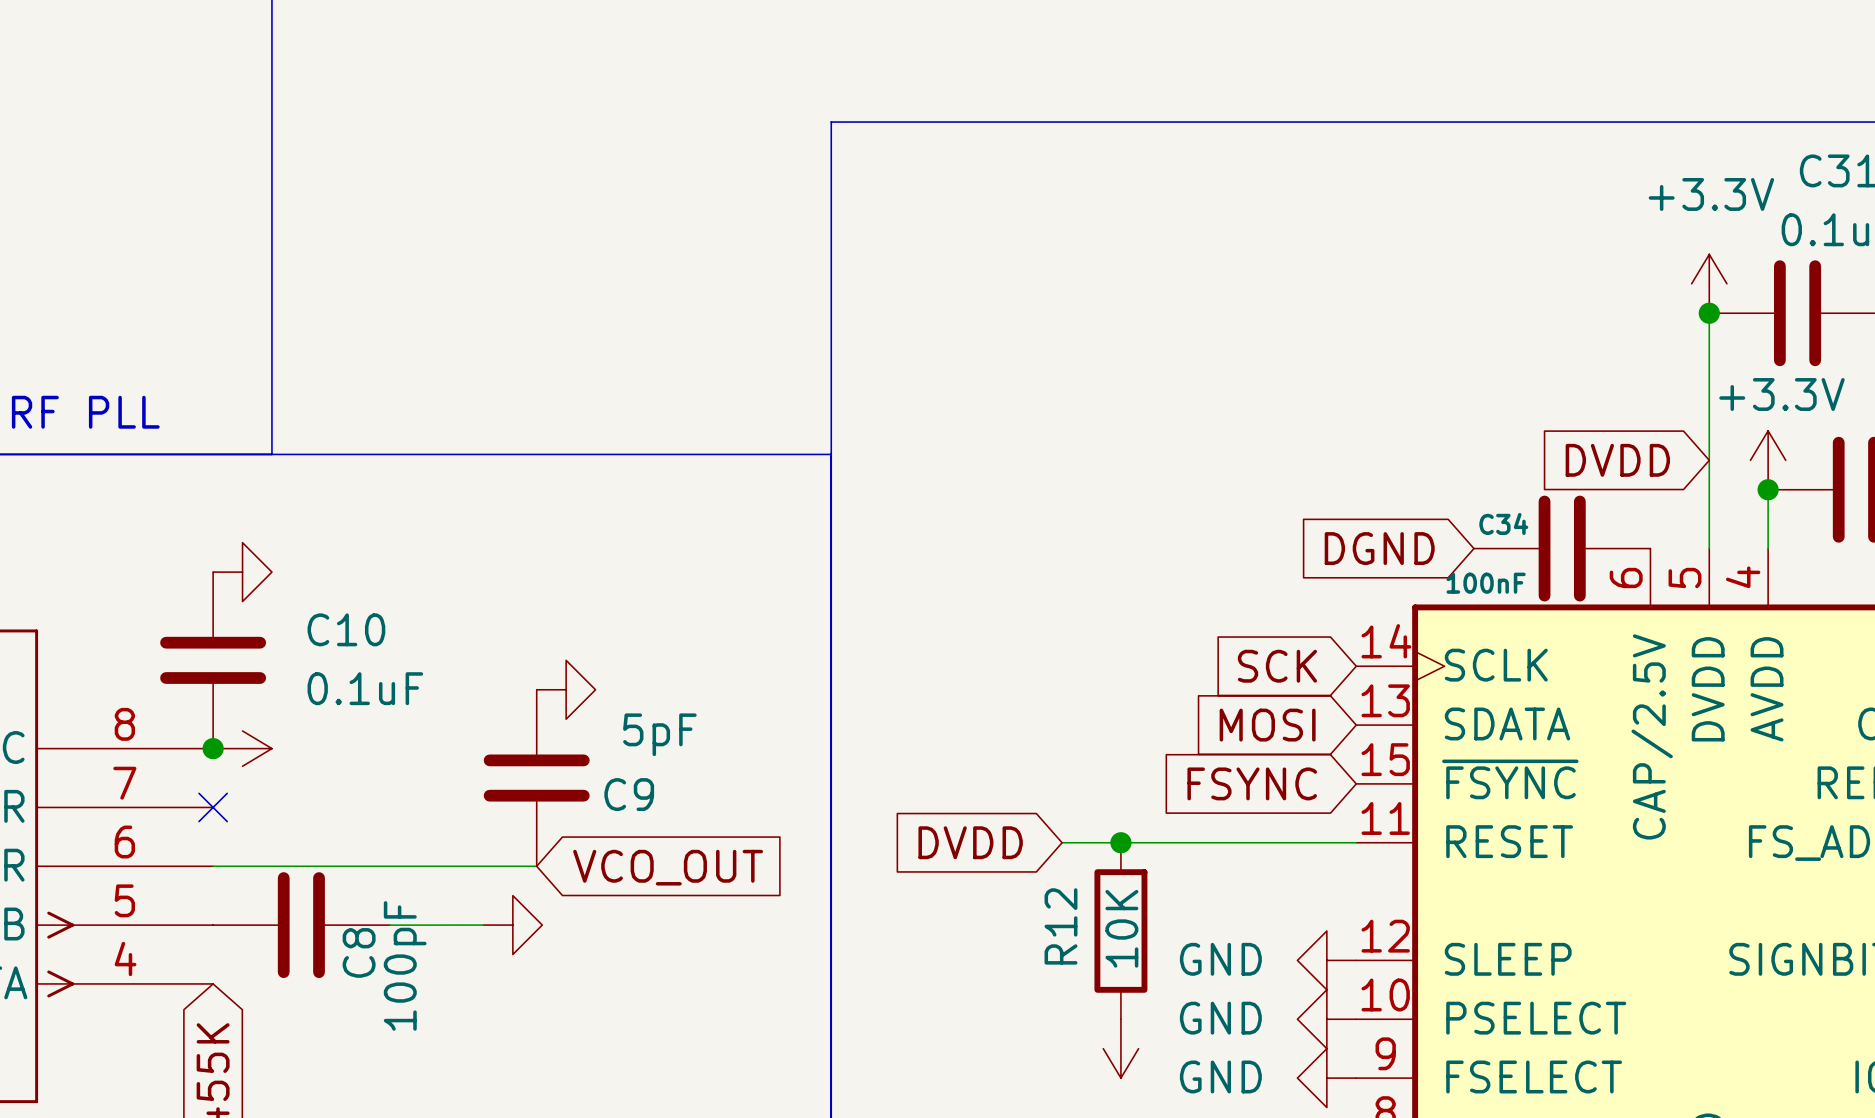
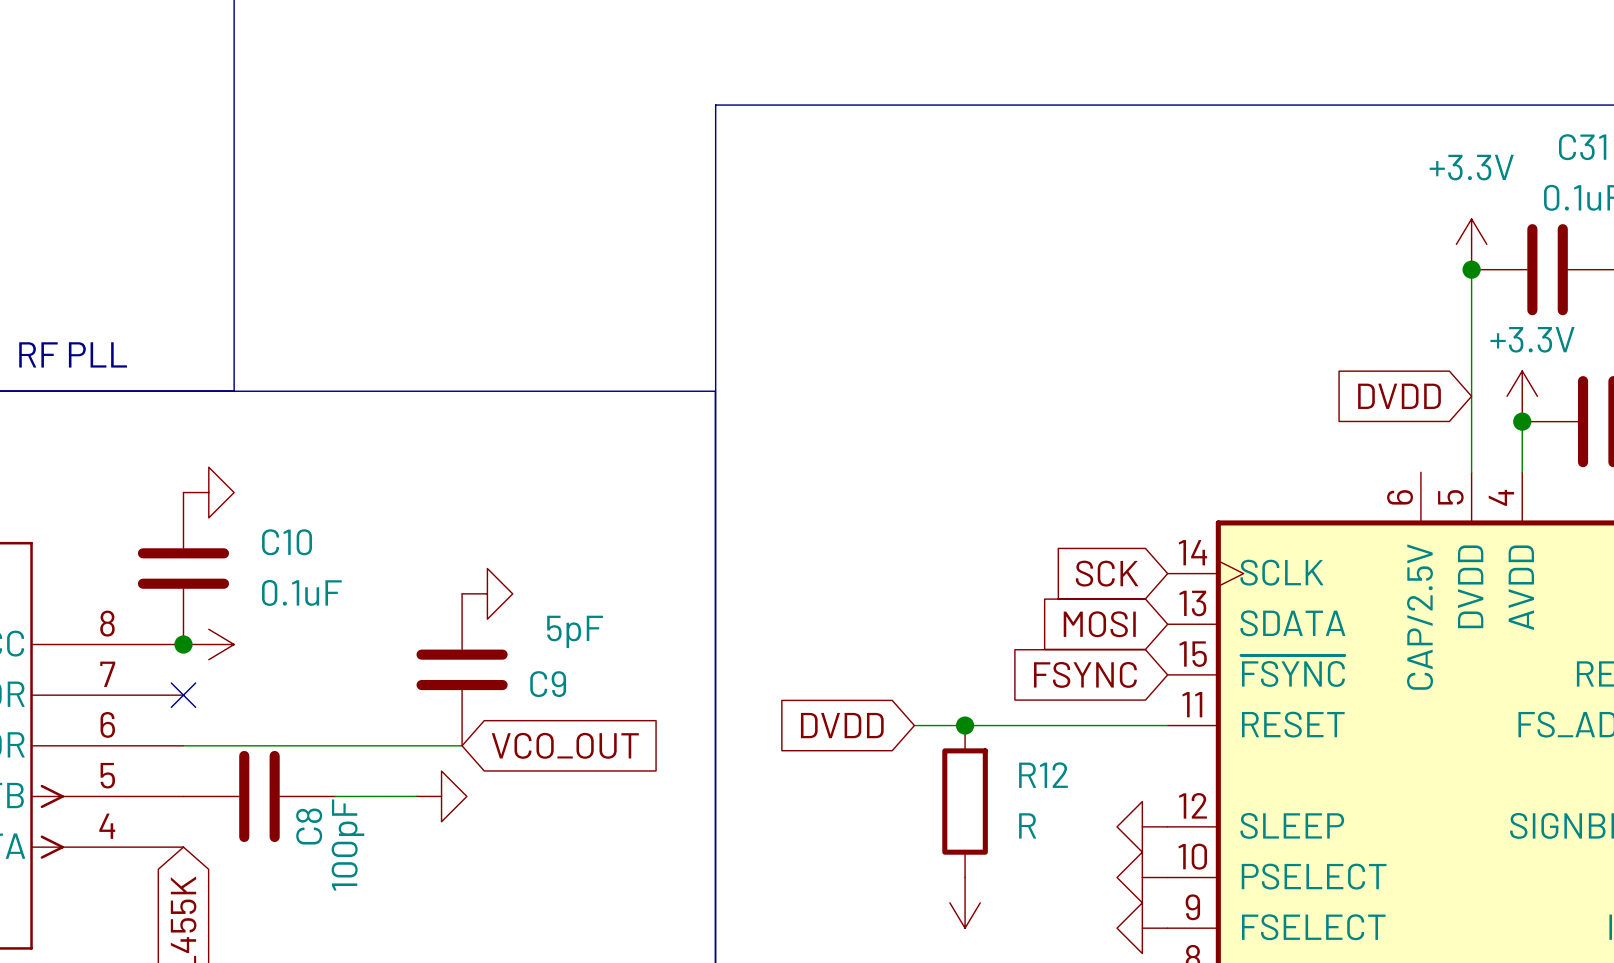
global label: DGND (1379, 548) -> none
C34: 100nF (1562, 548) -> none
R12 name rotation: 0° (1060, 926) -> 90° clockwise (1043, 775)
R12 name position: R12 (1060, 926) -> R12 (1043, 775)
R12 value: 10K (1121, 928) -> R (1027, 825)
power symbol text: GND (1220, 959) -> none
power symbol text: GND (1220, 1018) -> none
power symbol text: GND (1220, 1076) -> none

